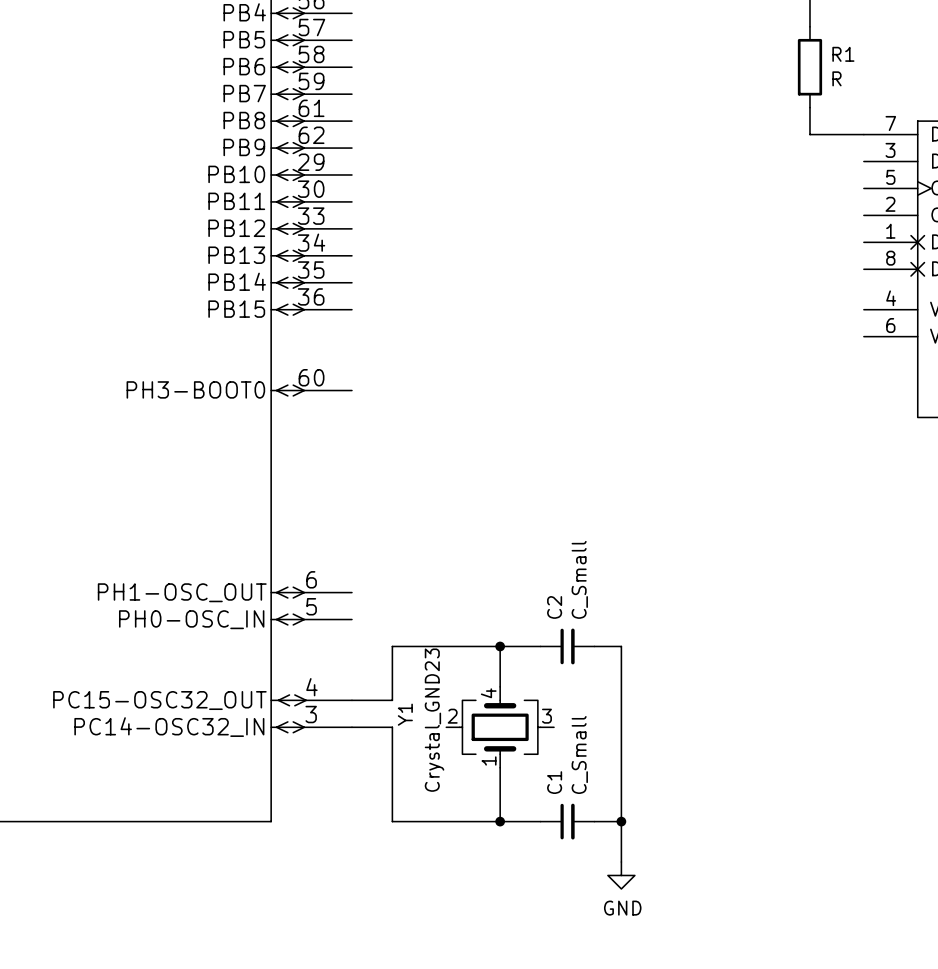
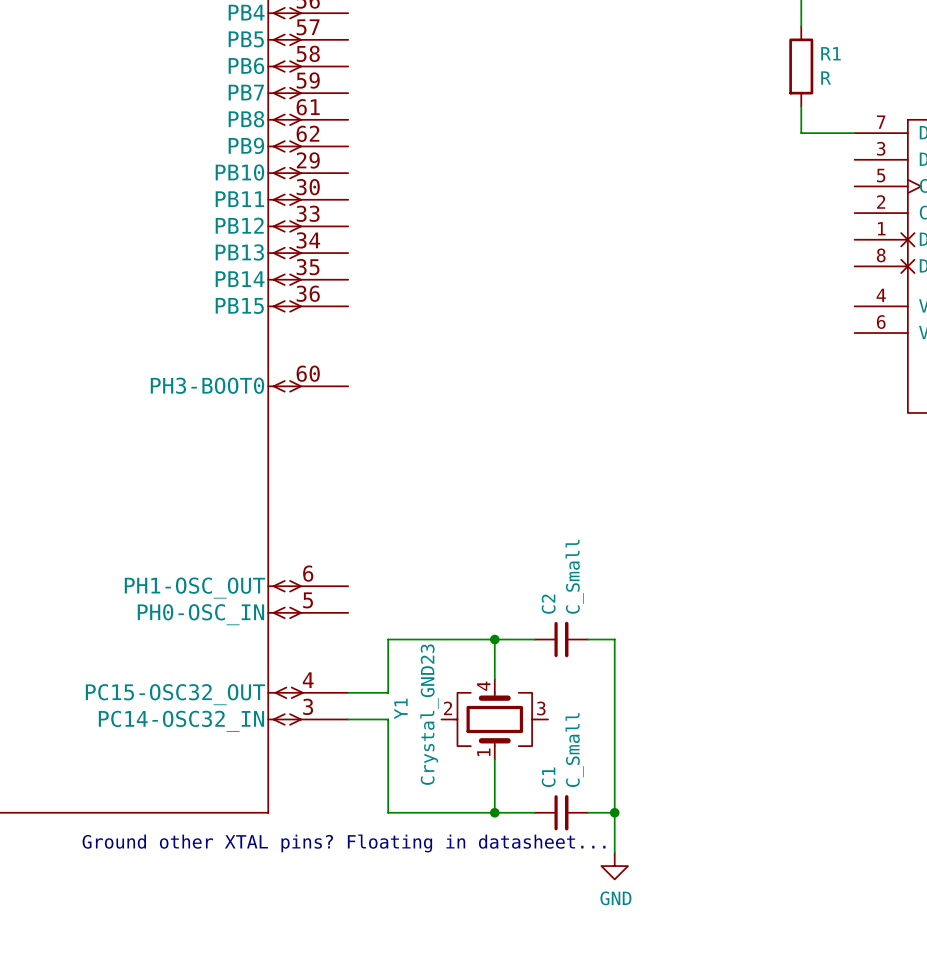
text: none -> Ground other XTAL pins? Floating in datasheet... (344, 843)

